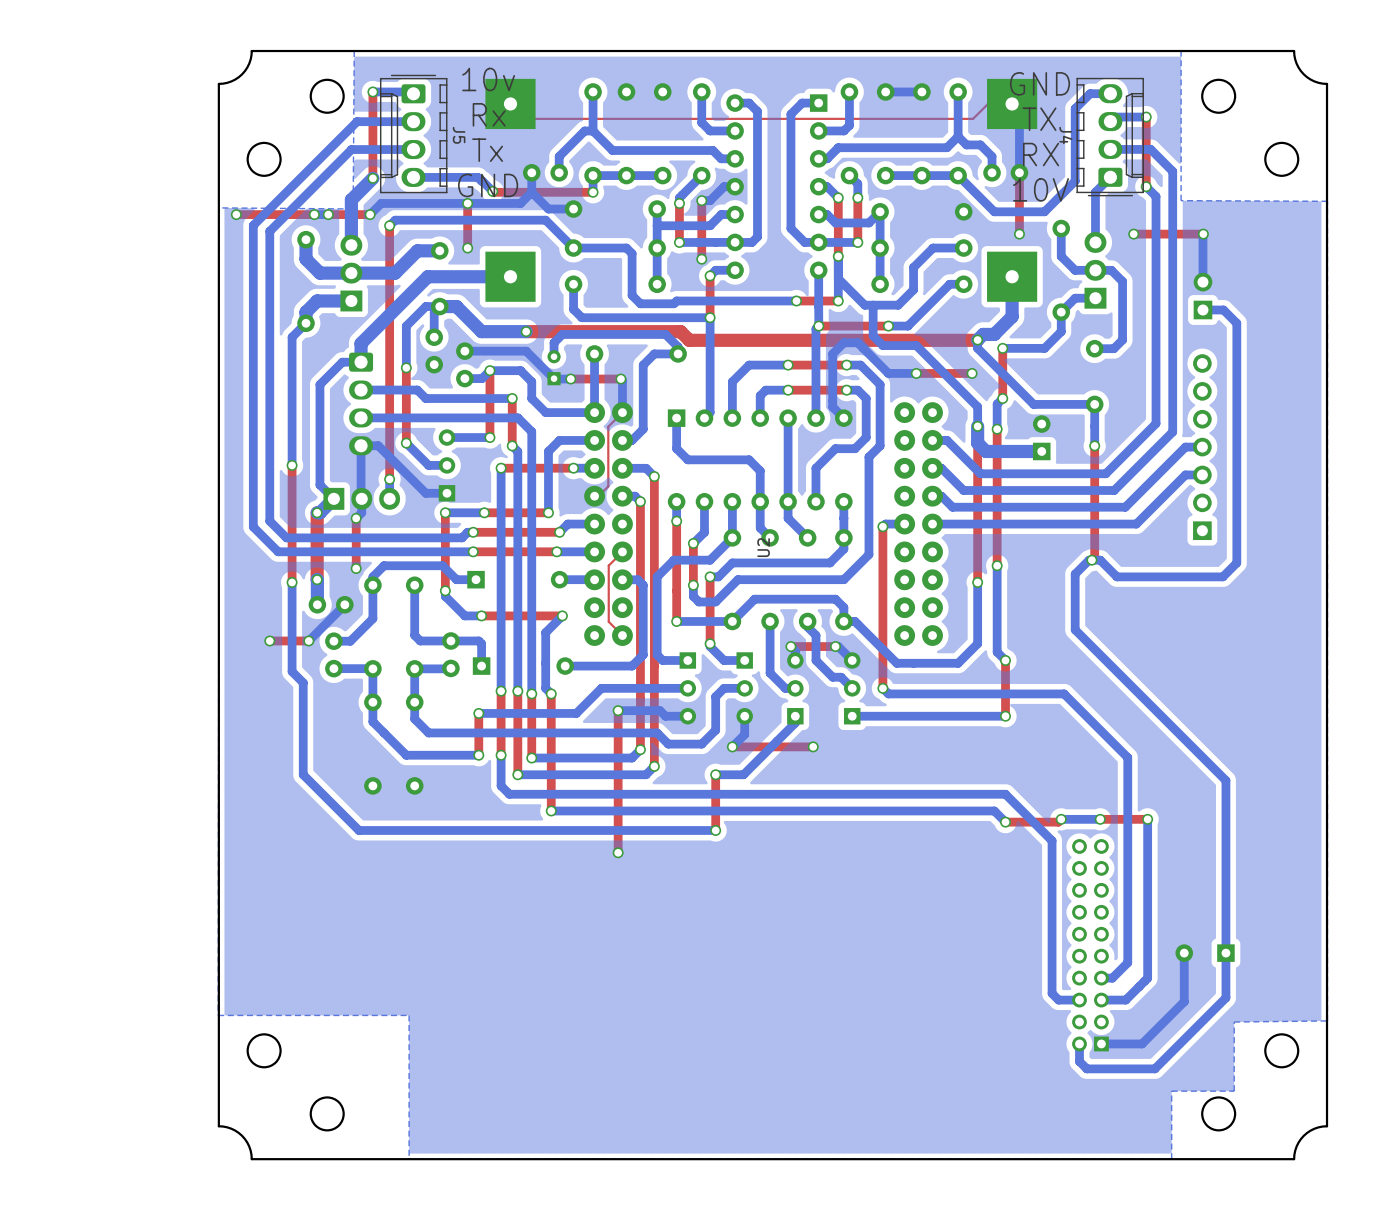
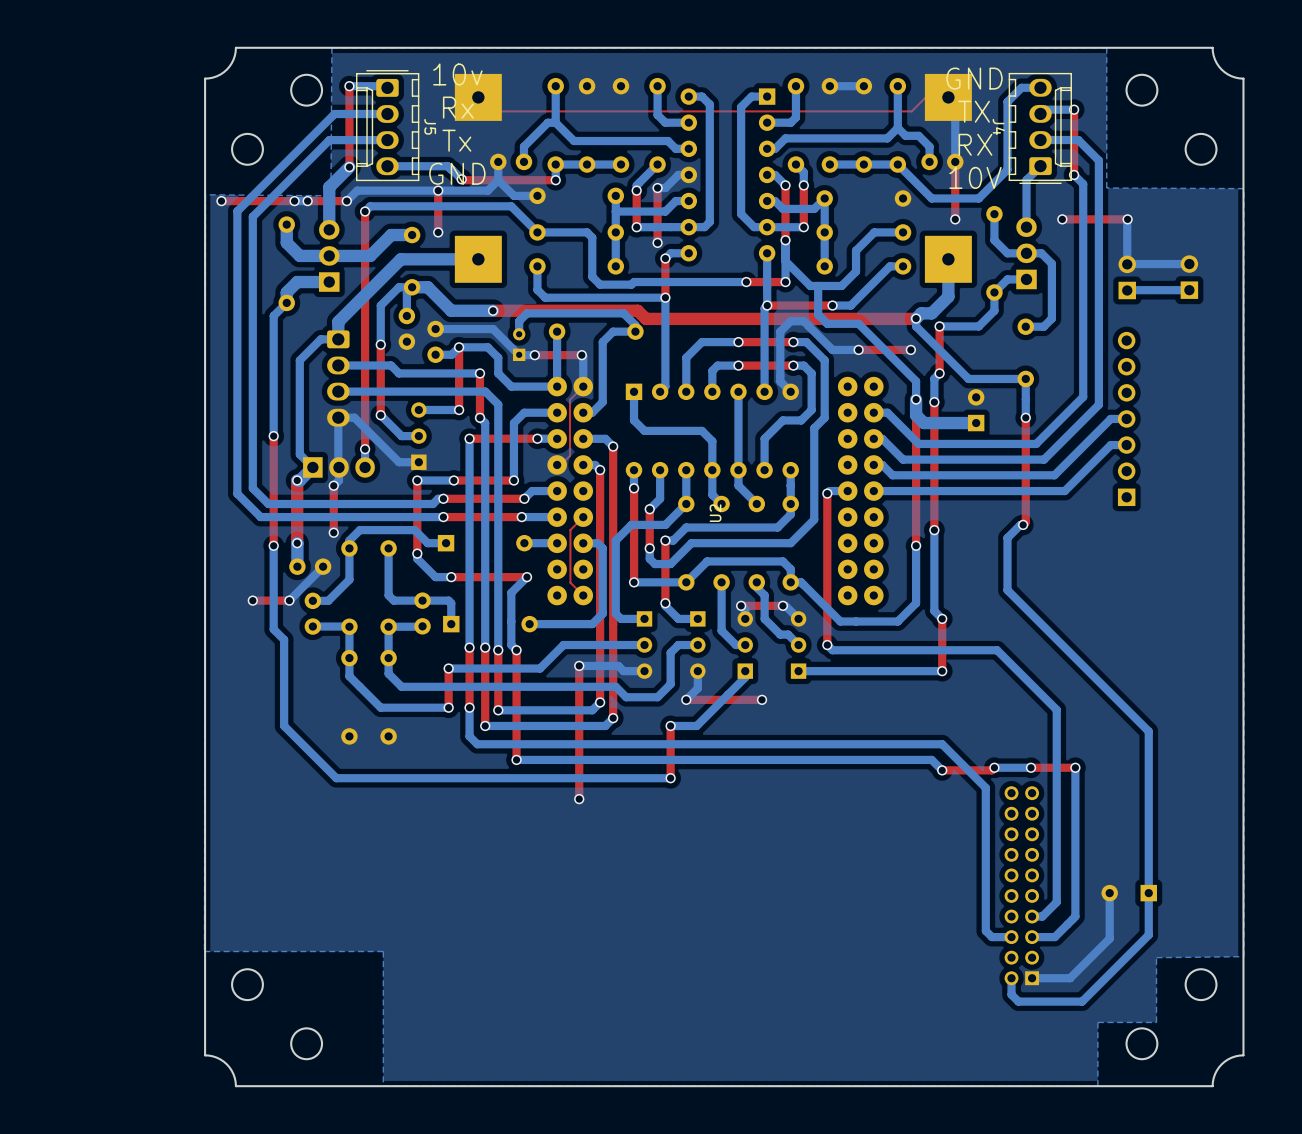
bottom track: none -> (1189, 264) (1127, 264)
part: none -> (1189, 277)
bottom track: (1202, 310) (1223, 310) (1236, 323) (1236, 562) (1222, 576) (1116, 576) (1100, 560) (1091, 560) -> (1127, 290) (1189, 290)

